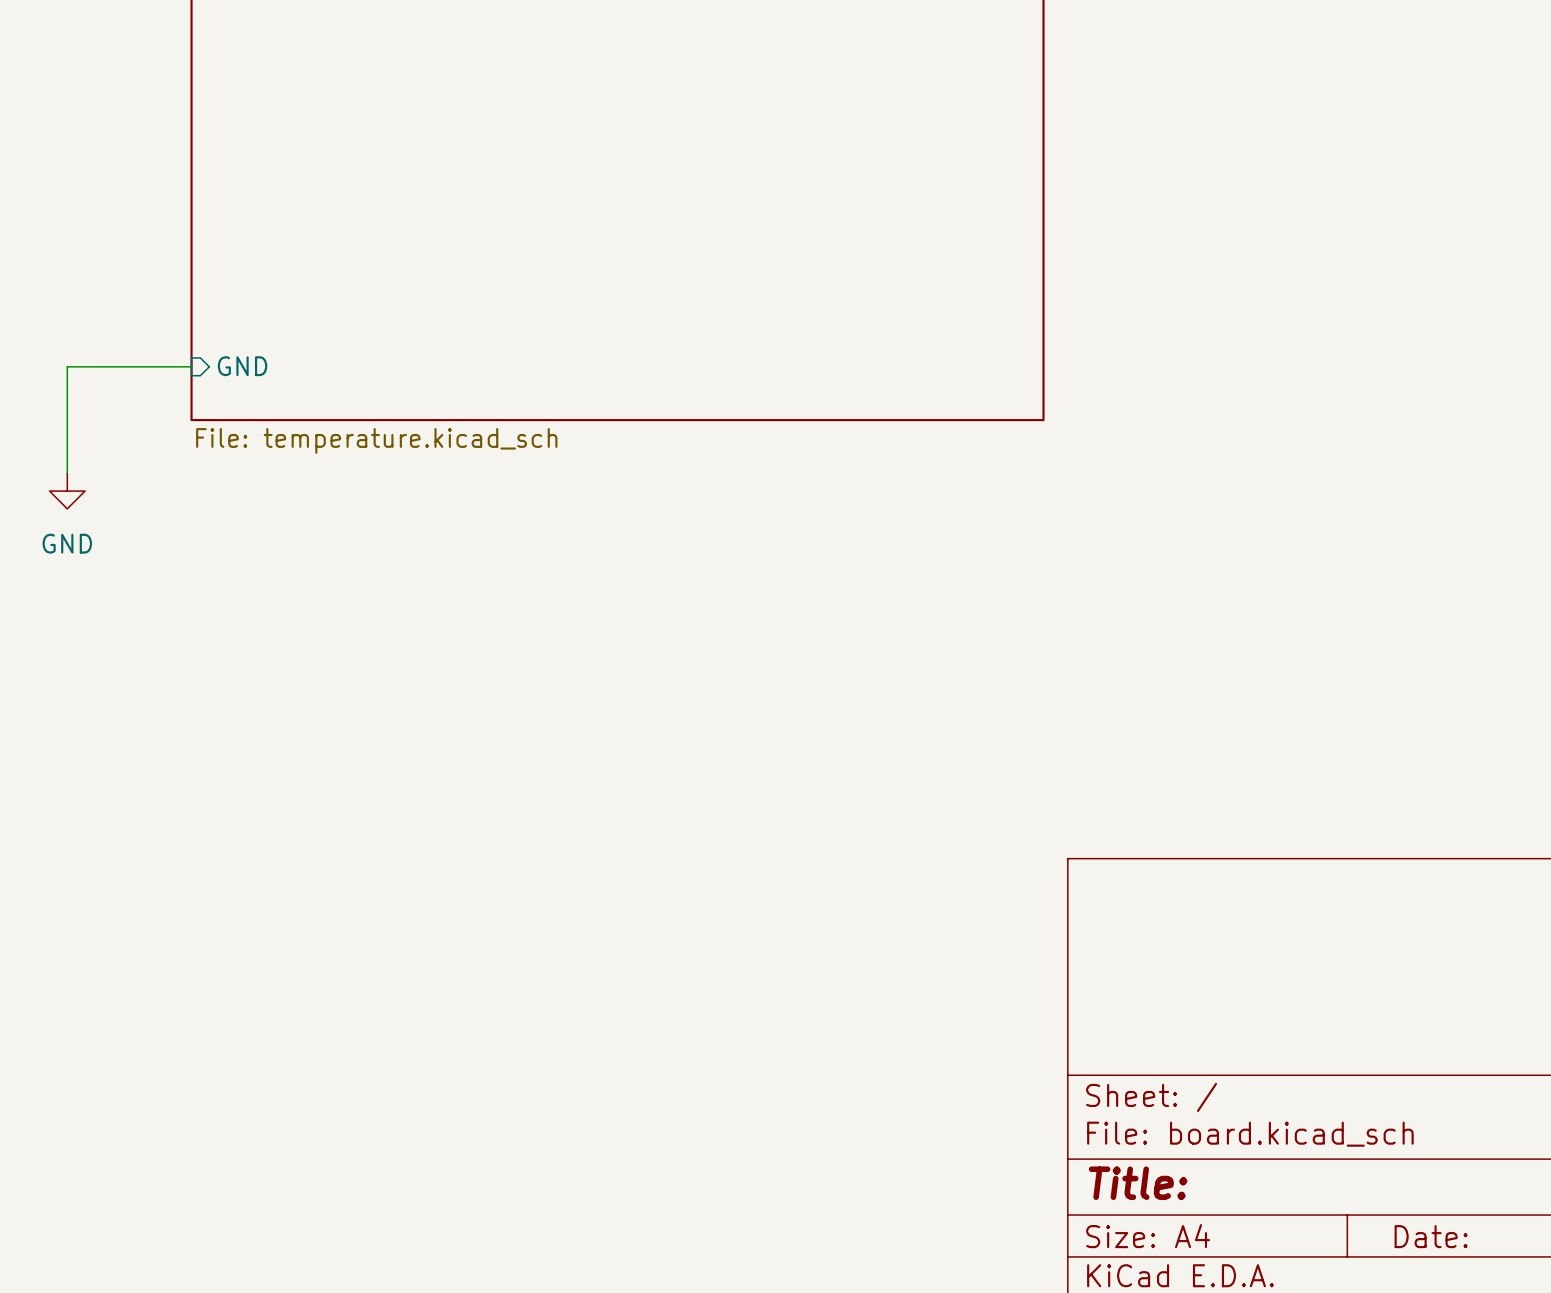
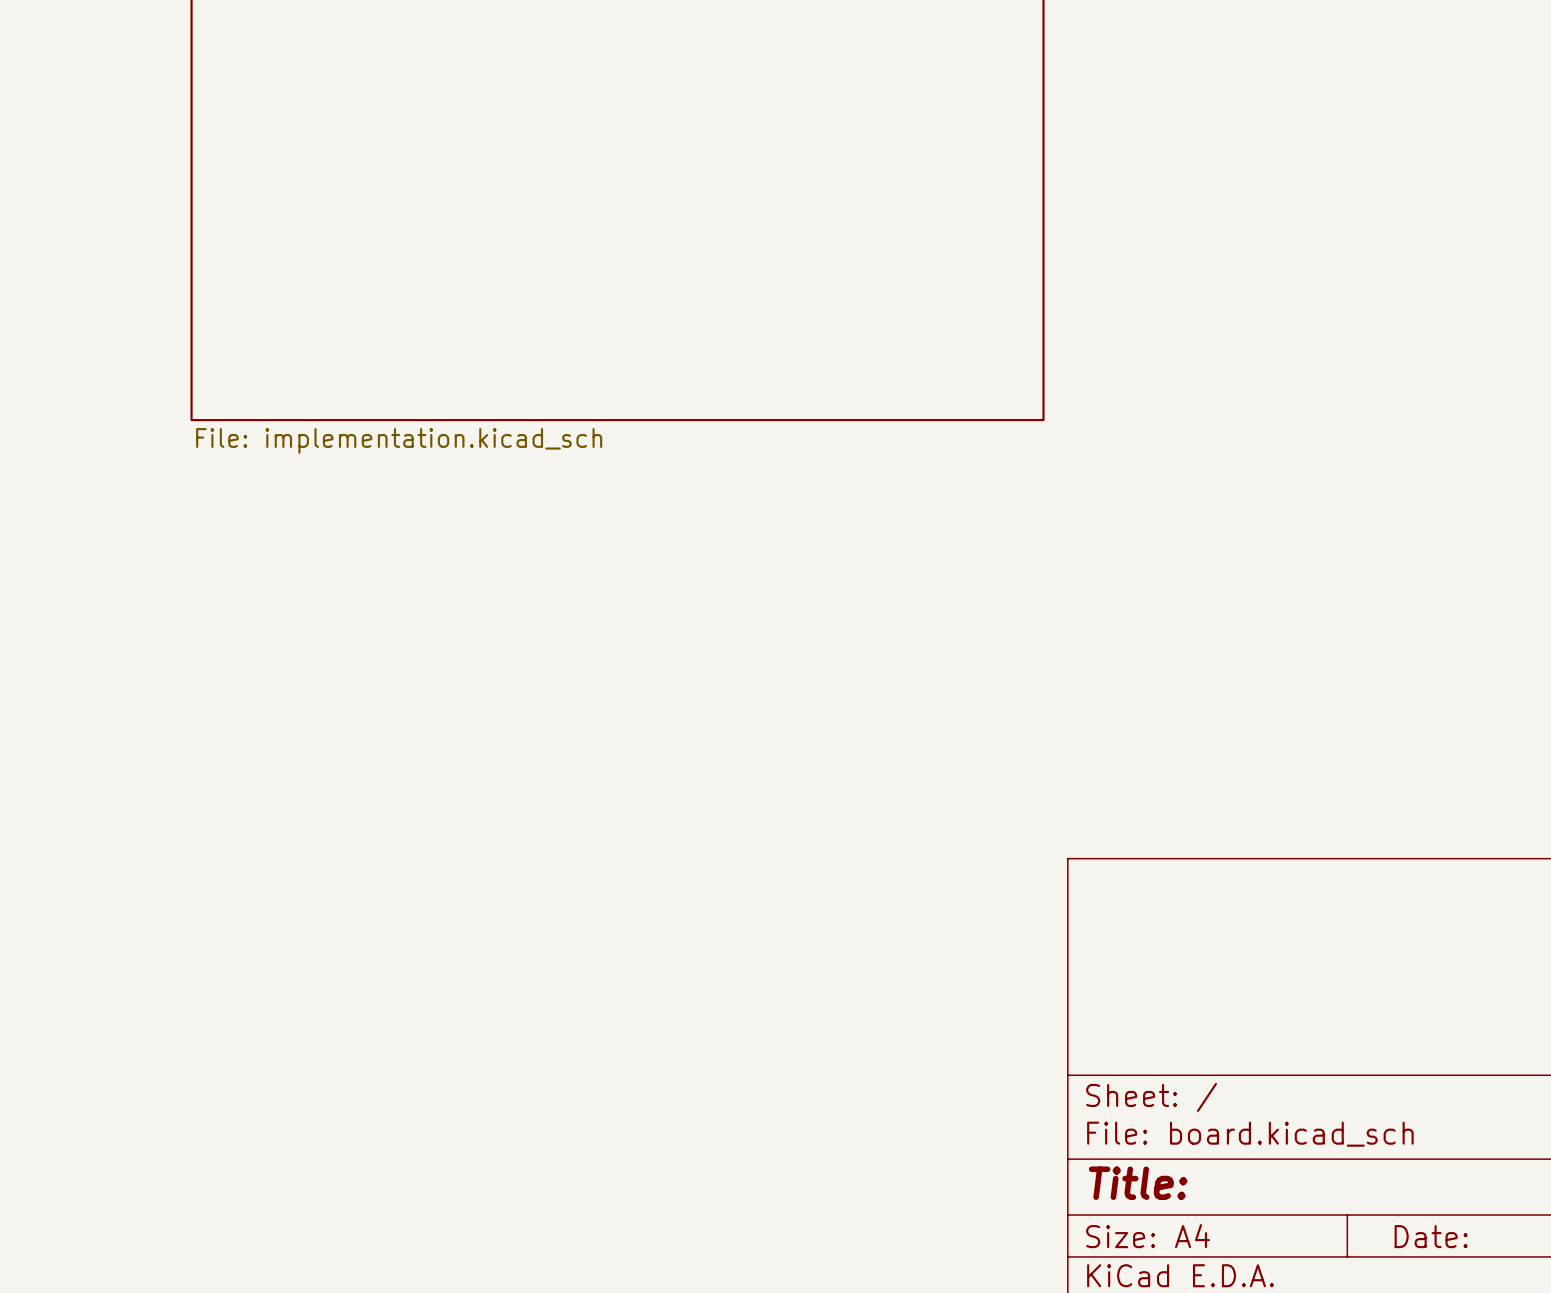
wire: (191, 366) (67, 366) (67, 473) -> none
sheet pin: GND (242, 366) -> none
sheet value: File: temperature.kicad_sch (376, 440) -> File: implementation.kicad_sch (399, 440)
power symbol: GND (67, 491) -> none

